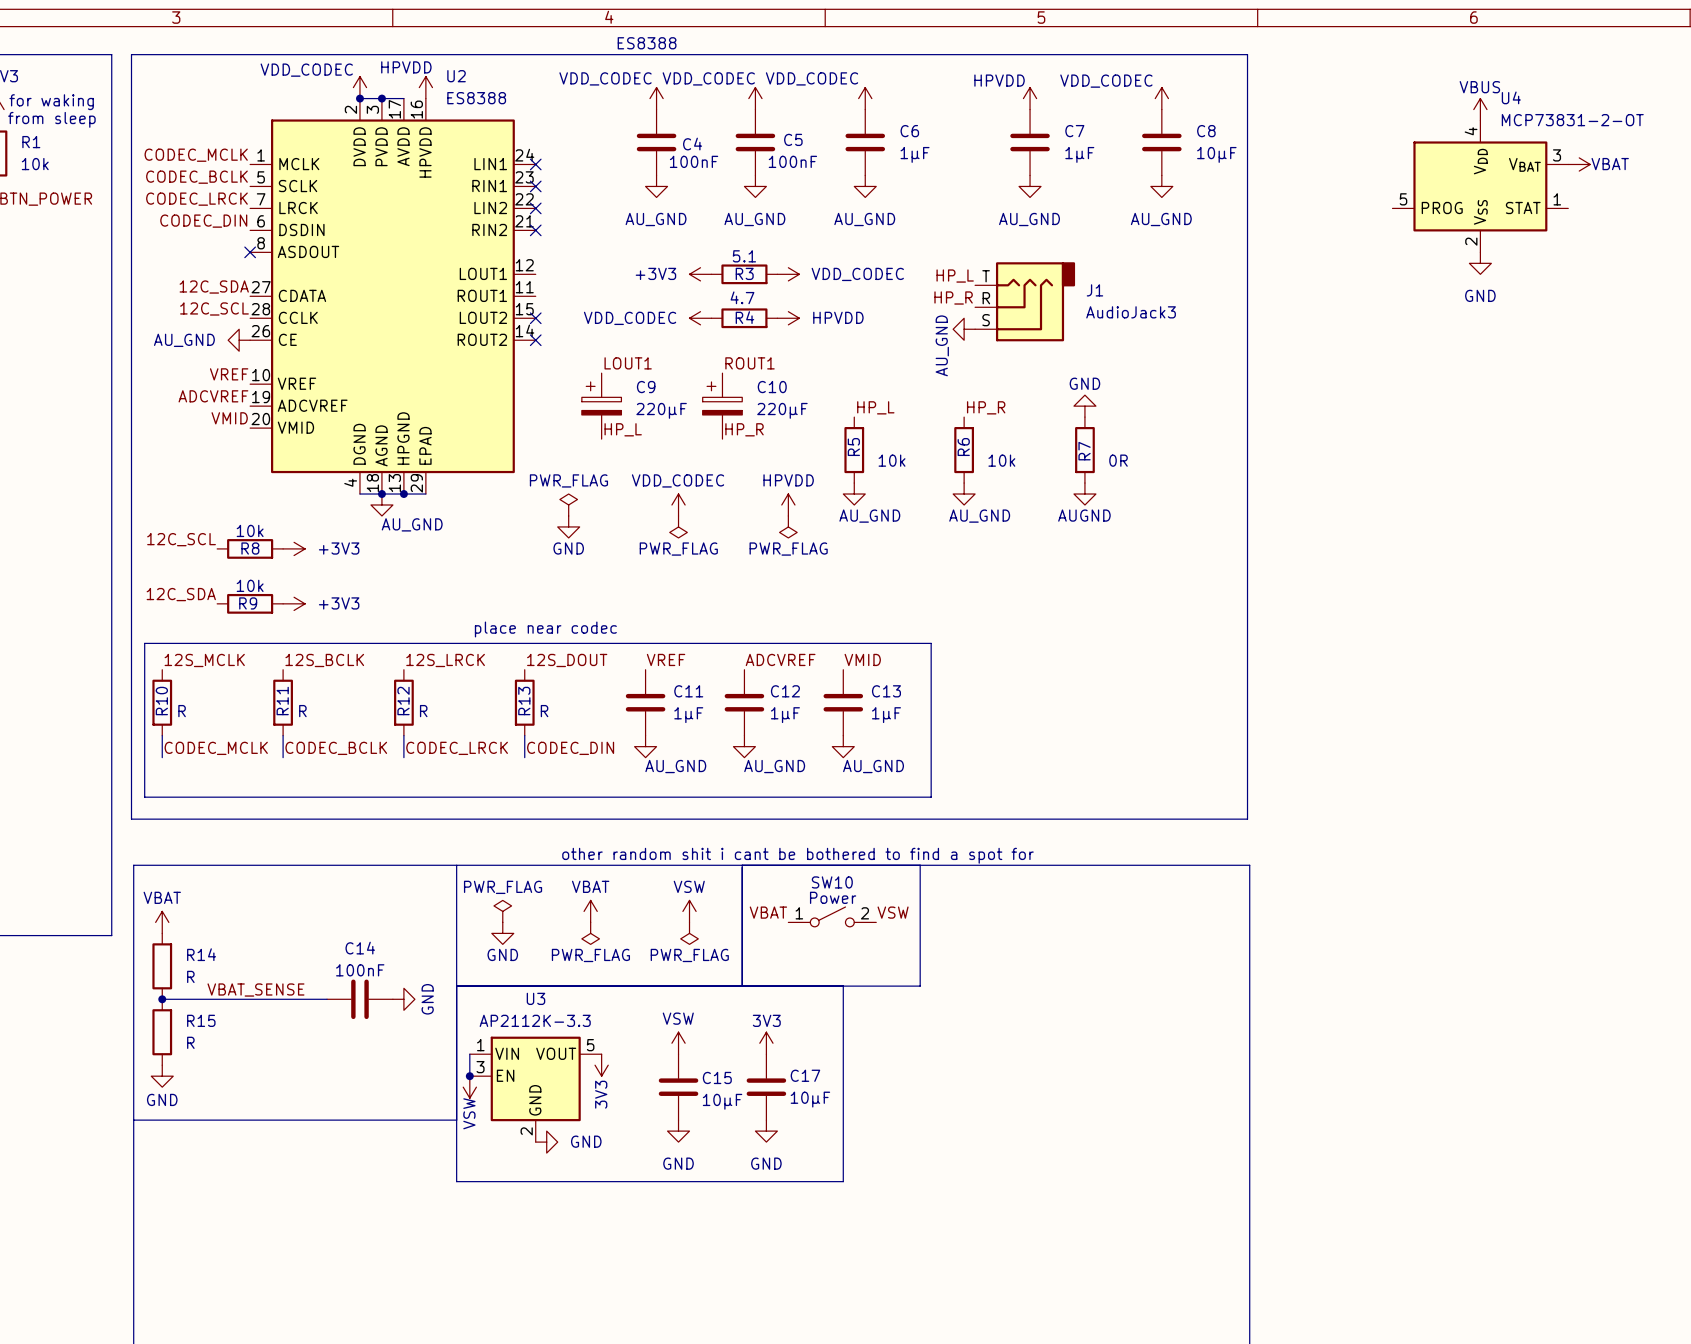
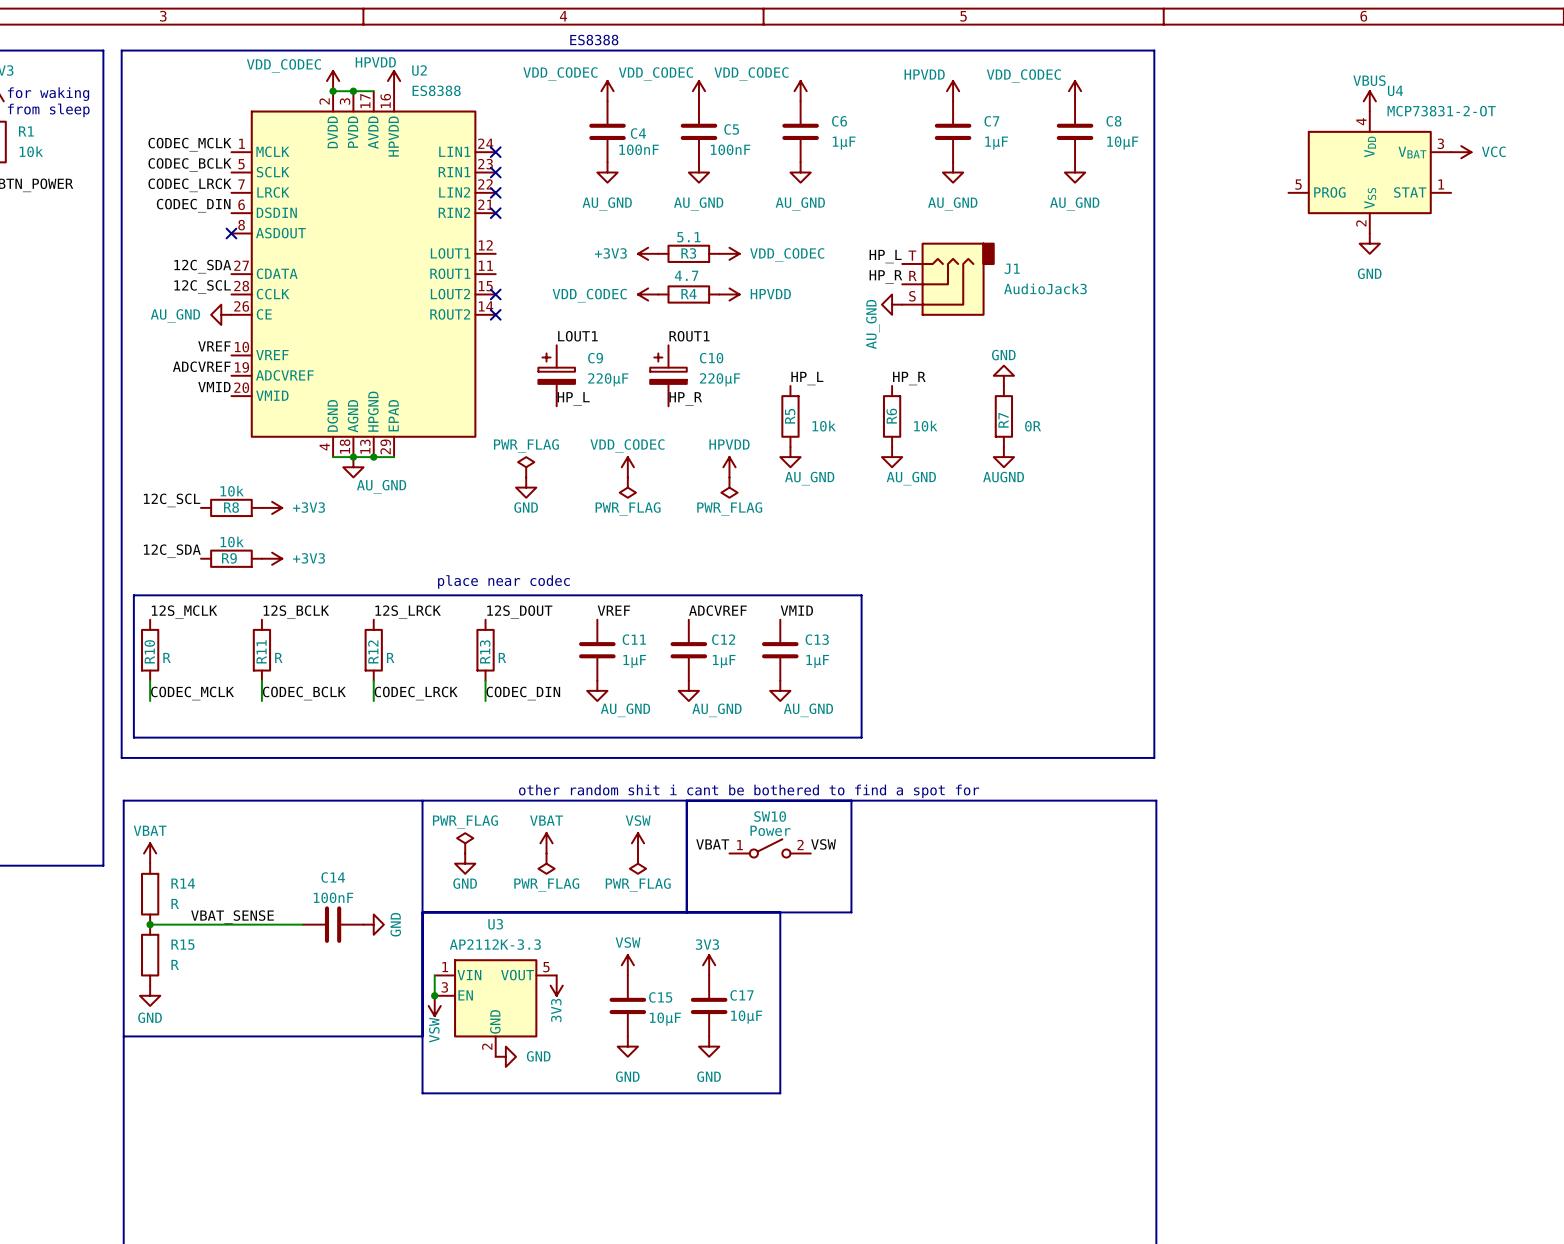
power symbol: VBAT (1579, 164) -> VCC (1461, 152)

